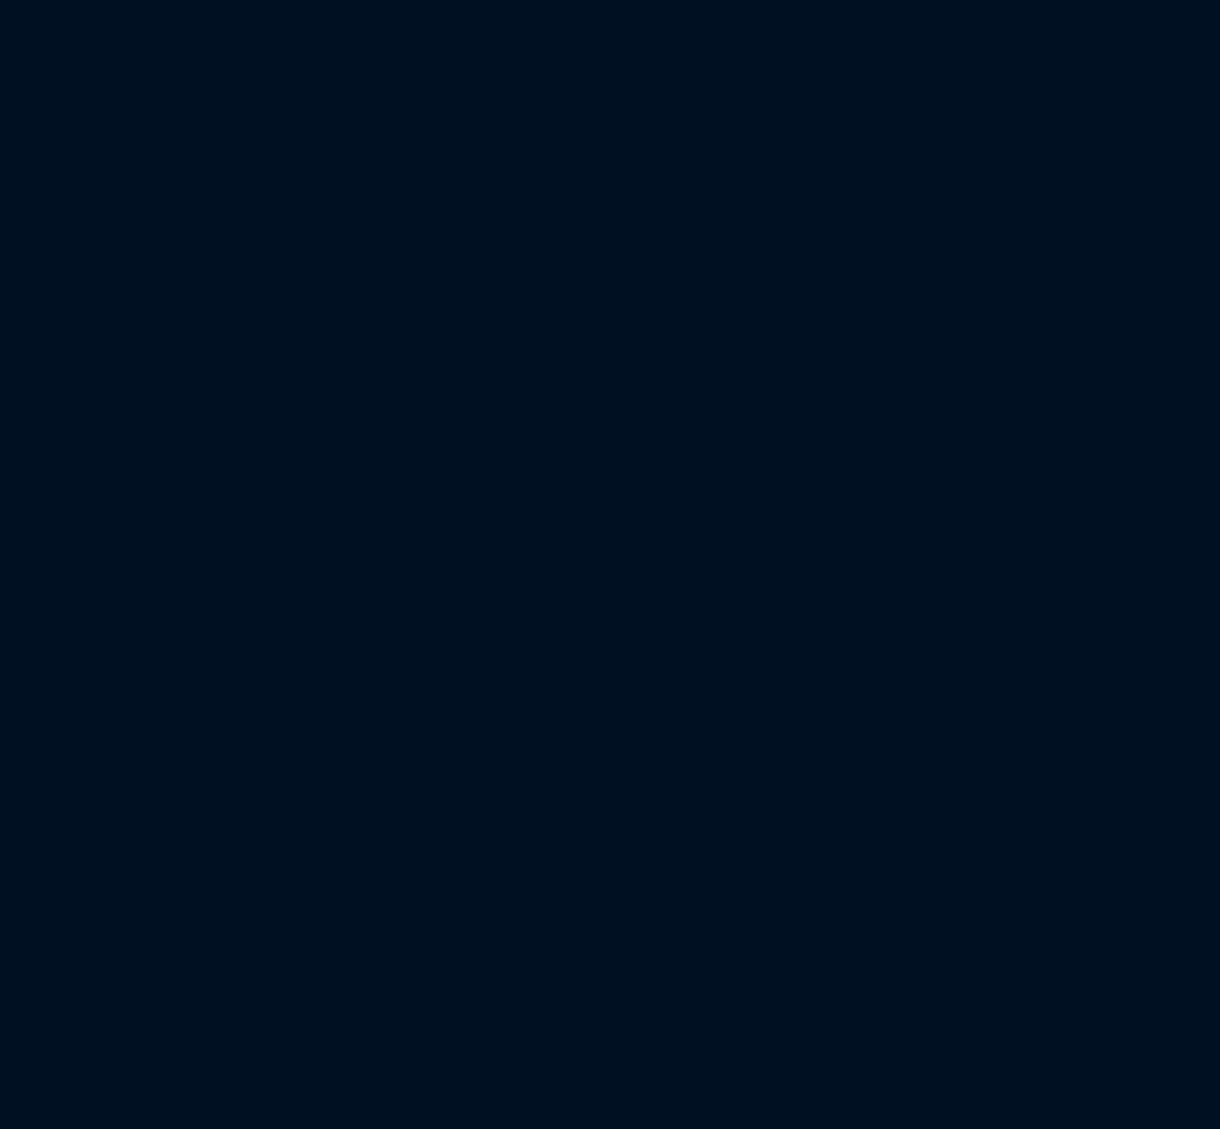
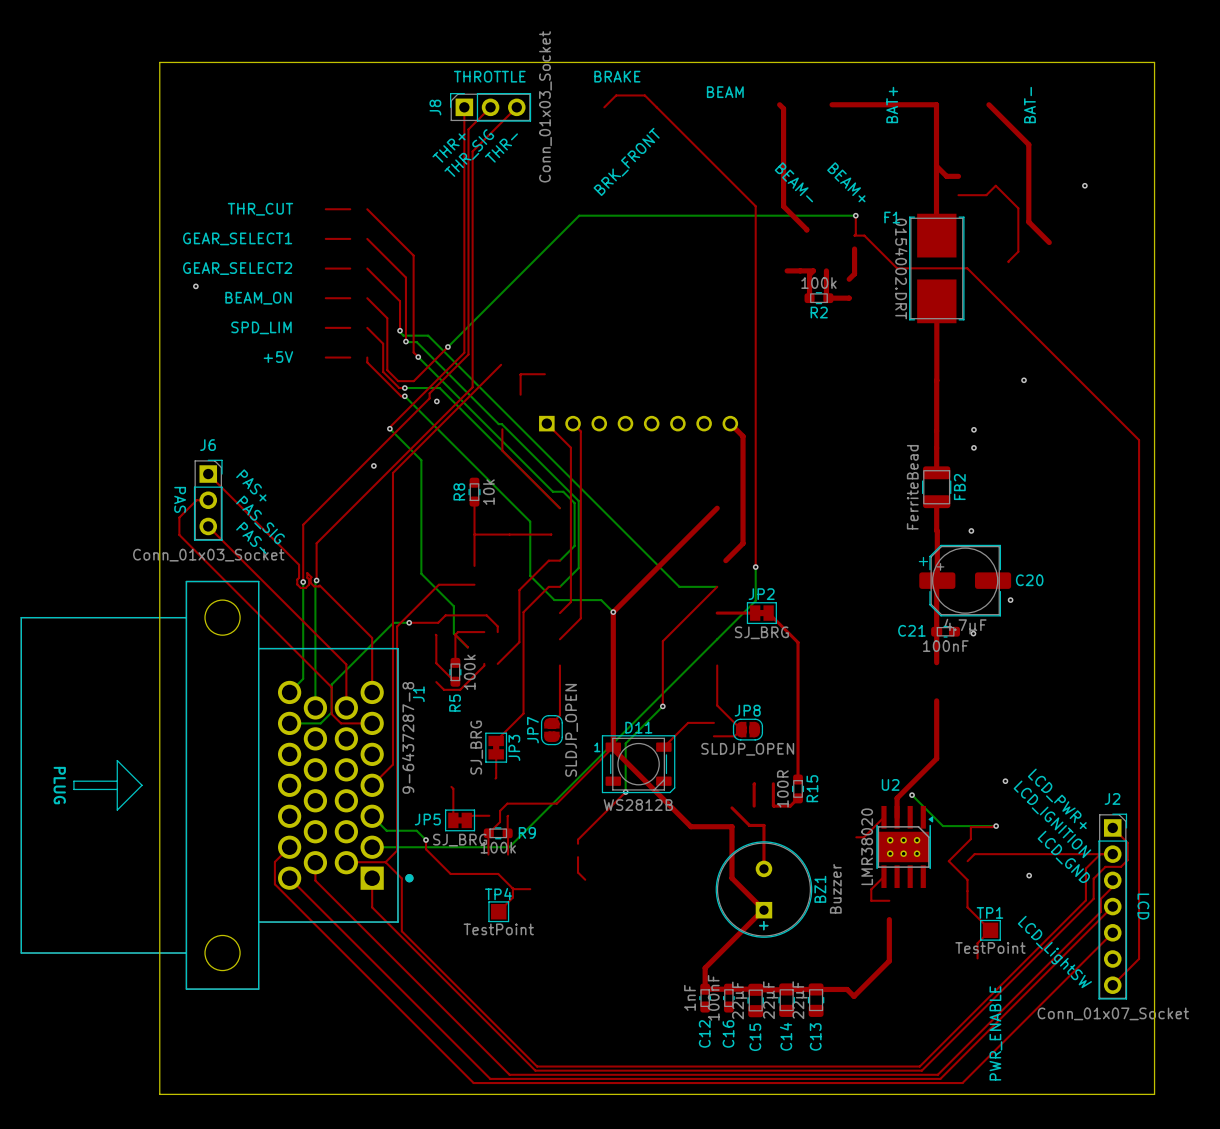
board edge: none -> (159, 62) (1154, 62) (1154, 1094) (159, 1094) (159, 62)
text: none -> THROTTLE (489, 76)
text: none -> BRAKE (617, 76)
text: none -> BEAM (725, 92)
top track: none -> (779, 104) (783, 108) (783, 206) (806, 230)
top track: none -> (832, 104) (936, 104) (936, 235)
text: none -> BAT+ (892, 104)
top track: none -> (988, 104) (1028, 144) (1028, 222) (1049, 242)
text: none -> BAT- (1029, 105)
top track: none -> (464, 107) (464, 352) (389, 428)
top track: none -> (490, 107) (468, 129) (468, 354) (429, 393) (429, 398) (303, 524) (303, 582)
J8: none -> Conn_01x03_Socket (490, 107)
top track: none -> (516, 107) (472, 151) (472, 387) (316, 543) (316, 580)
top track: none -> (604, 107) (616, 95) (644, 95) (755, 206) (755, 567)
text: none -> THR+ (449, 147)
text: none -> THR- (501, 147)
text: none -> THR_SIG (469, 153)
text: none -> BRK_FRONT (626, 161)
top track: none -> (936, 166) (946, 176) (958, 176)
text: none -> BEAM- (793, 182)
text: none -> BEAM+ (846, 182)
via: none -> (1084, 185)
top track: none -> (958, 195) (986, 195) (995, 185) (1018, 208) (1018, 251) (1008, 262)
text: none -> THR_CUT (260, 209)
top track: none -> (325, 209) (350, 209)
top track: none -> (367, 209) (413, 255) (413, 352) (418, 357)
top track: none -> (855, 215) (854, 235) (864, 235) (897, 268) (967, 268) (1139, 440) (1139, 958) (1112, 985)
bottom track: none -> (855, 215) (579, 215) (447, 347)
via: none -> (855, 215)
text: none -> GEAR_SELECT1 (237, 238)
top track: none -> (325, 238) (350, 238)
top track: none -> (367, 238) (405, 277) (405, 341)
top track: none -> (854, 249) (854, 273) (849, 279)
text: none -> GEAR_SELECT2 (237, 268)
top track: none -> (325, 268) (350, 268)
top track: none -> (367, 268) (400, 301) (400, 330)
F1: none -> 0154002.DRT (936, 268)
top track: none -> (787, 270) (813, 270) (809, 274) (809, 298)
top track: none -> (826, 270) (826, 296) (828, 298) (849, 298)
via: none -> (195, 286)
text: none -> BEAM_ON (258, 298)
top track: none -> (325, 298) (350, 298)
top track: none -> (367, 298) (387, 318) (387, 370) (398, 381) (413, 381) (447, 347)
R2: none -> 100k (818, 298)
top track: none -> (936, 301) (936, 380)
text: none -> SPD_LIM (261, 327)
top track: none -> (325, 327) (350, 327)
top track: none -> (367, 327) (383, 343) (383, 371) (399, 388) (404, 388)
bottom track: none -> (400, 330) (403, 335) (428, 335) (679, 586) (717, 586)
via: none -> (400, 330)
bottom track: none -> (405, 341) (416, 342) (578, 501) (578, 568) (559, 586)
via: none -> (405, 341)
via: none -> (447, 347)
text: none -> +5V (278, 357)
top track: none -> (325, 357) (350, 357)
top track: none -> (367, 357) (367, 362) (401, 396) (404, 396)
bottom track: none -> (418, 357) (552, 491) (563, 491) (574, 503) (574, 546) (559, 560)
via: none -> (418, 357)
top track: none -> (501, 364) (392, 472) (392, 764) (372, 785)
top track: none -> (520, 374) (520, 394)
top track: none -> (544, 374) (520, 374)
top track: none -> (936, 380) (936, 470)
via: none -> (1024, 380)
bottom track: none -> (404, 388) (439, 388) (559, 508)
via: none -> (404, 388)
bottom track: none -> (404, 396) (530, 521) (530, 575) (554, 600) (601, 600) (613, 612)
via: none -> (404, 396)
via: none -> (436, 401)
top track: none -> (546, 423) (570, 447) (570, 602) (559, 613)
top track: none -> (573, 423) (580, 431) (580, 618) (559, 639)
part: none -> (638, 423)
top track: none -> (730, 423) (743, 436) (743, 543) (725, 560)
bottom track: none -> (389, 428) (421, 460) (421, 573) (453, 606) (453, 633) (467, 647)
via: none -> (389, 428)
top track: none -> (502, 429) (502, 450) (559, 508)
via: none -> (973, 429)
via: none -> (973, 447)
via: none -> (373, 465)
top track: none -> (207, 473) (299, 564) (297, 584) (300, 587) (305, 587) (309, 584) (307, 573) (311, 577) (310, 582) (314, 586) (319, 585) (372, 637) (372, 692)
text: none -> PAS+ (251, 485)
FB2: none -> FerriteBead (936, 487)
R8: none -> 10k (474, 492)
text: none -> PAS (180, 499)
top track: none -> (208, 500) (196, 500) (179, 517) (179, 534) (331, 687) (331, 714) (341, 723) (372, 723)
J6: none -> Conn_01x03_Socket (208, 500)
top track: none -> (474, 501) (474, 565)
top track: none -> (936, 503) (936, 662)
top track: none -> (717, 508) (613, 612) (613, 749) (690, 826) (731, 826) (731, 878) (763, 910) (705, 967) (705, 989) (847, 989) (854, 996) (889, 961) (889, 919)
text: none -> PAS_SIG (260, 519)
top track: none -> (207, 525) (346, 664) (346, 707)
via: none -> (971, 530)
top track: none -> (474, 534) (551, 534)
text: none -> PAS- (251, 537)
top track: none -> (559, 560) (548, 560) (519, 590) (519, 642) (497, 663)
bottom track: none -> (755, 567) (755, 600) (509, 847) (372, 847)
via: none -> (755, 567)
bottom track: none -> (316, 580) (315, 707)
via: none -> (316, 580)
C20: none -> 4.7µF (964, 580)
bottom track: none -> (303, 582) (303, 678) (289, 692)
via: none -> (303, 582)
top track: none -> (474, 584) (438, 584) (397, 626) (397, 850) (385, 862)
top track: none -> (559, 586) (548, 586) (523, 612) (523, 713) (496, 740)
top track: none -> (717, 586) (662, 641) (662, 706)
via: none -> (1010, 600)
via: none -> (613, 612)
top track: none -> (717, 613) (755, 613)
JP2: none -> SJ_BRG (761, 613)
top track: none -> (768, 613) (798, 642) (798, 779)
top track: none -> (408, 622) (438, 622) (445, 615) (486, 615) (497, 626) (497, 632)
bottom track: none -> (409, 622) (393, 622) (331, 684) (331, 712) (320, 723) (289, 723)
via: none -> (409, 622)
C21: none -> 100nF (945, 631)
top track: none -> (484, 632) (458, 632) (455, 634)
via: none -> (973, 633)
top track: none -> (435, 634) (436, 663) (455, 681)
top track: none -> (455, 634) (467, 647)
top track: none -> (455, 634) (455, 662)
top track: none -> (484, 663) (460, 689) (444, 689) (436, 682)
top track: none -> (559, 665) (559, 715) (551, 723)
top track: none -> (717, 665) (717, 705) (741, 729) (734, 736) (713, 736)
R5: none -> 100k (455, 672)
top track: none -> (936, 700) (936, 758) (897, 798) (897, 817)
bottom track: none -> (662, 706) (625, 743) (625, 792)
via: none -> (662, 706)
top track: none -> (713, 722) (688, 722) (663, 747)
JP8: none -> SLDJP_OPEN (747, 729)
JP7: none -> SLDJP_OPEN (551, 730)
JP3: none -> SJ_BRG (496, 747)
top track: none -> (613, 747) (556, 803) (507, 803) (500, 810) (500, 822) (488, 833) (488, 854)
top track: none -> (496, 754) (495, 778)
D11: none -> WS2812B (638, 764)
via: none -> (1005, 781)
top track: none -> (754, 783) (754, 806)
top track: none -> (773, 783) (773, 806) (790, 806) (798, 798)
J1: none -> 9-6437287-8 (217, 785)
top track: none -> (451, 786) (453, 788) (453, 820)
R15: none -> 100R (798, 788)
top track: none -> (625, 792) (578, 839) (578, 843)
via: none -> (625, 792)
bottom track: none -> (912, 795) (943, 826) (996, 826)
via: none -> (912, 795)
text: none -> LCD_PWR+ (1057, 798)
top track: none -> (731, 807) (749, 825) (763, 825) (763, 868)
top track: none -> (489, 815) (471, 815) (466, 820)
top track: none -> (508, 815) (508, 854)
bottom track: none -> (372, 816) (386, 830) (416, 830) (426, 840)
top track: none -> (883, 817) (863, 837) (856, 837)
text: none -> LCD_IGNITION (1052, 819)
JP5: none -> SJ_BRG (460, 820)
top track: none -> (996, 826) (970, 827) (970, 839) (948, 861) (967, 879) (967, 907) (990, 930) (977, 943) (977, 958)
via: none -> (996, 826)
top track: none -> (1112, 827) (1127, 842) (1127, 860) (1121, 866) (1105, 866) (1093, 878) (1093, 898) (921, 1070) (535, 1070) (372, 907) (372, 878)
R9: none -> 100k (498, 833)
top track: none -> (426, 840) (426, 849) (450, 873) (498, 873) (513, 889) (530, 889)
via: none -> (426, 840)
U2: none -> LMR38020 (904, 846)
top track: none -> (289, 847) (274, 861) (274, 884) (473, 1083) (962, 1083) (1112, 932)
top track: none -> (1100, 854) (1085, 868) (1085, 900) (919, 1066) (537, 1066) (401, 931) (401, 878) (385, 862)
top track: none -> (1112, 854) (974, 854) (967, 861)
text: none -> LCD_GND (1063, 856)
top track: none -> (578, 857) (578, 872) (585, 879)
top track: none -> (315, 862) (315, 880) (509, 1074) (937, 1074) (1100, 911) (1100, 898) (1112, 886) (1112, 880)
top track: none -> (385, 862) (346, 862)
via: none -> (1029, 875)
top track: none -> (883, 876) (871, 889) (871, 900) (889, 900)
top track: none -> (289, 878) (490, 1078) (940, 1078) (1112, 906)
top track: none -> (512, 888) (512, 897) (498, 911)
BZ1: none -> Buzzer (763, 889)
J2: none -> Conn_01x07_Socket (1112, 906)
text: none -> LCD (1143, 906)
TP4: none -> TestPoint (498, 911)
TP1: none -> TestPoint (990, 930)
text: none -> LCD_LightSW (1054, 951)
C12: none -> 1nF (705, 998)
C16: none -> 100nF (728, 998)
C15: none -> 22µF (755, 1000)
C14: none -> 22µF (786, 1000)
C13: none -> 22µF (816, 1000)
text: none -> PWR_ENABLE (995, 1033)

